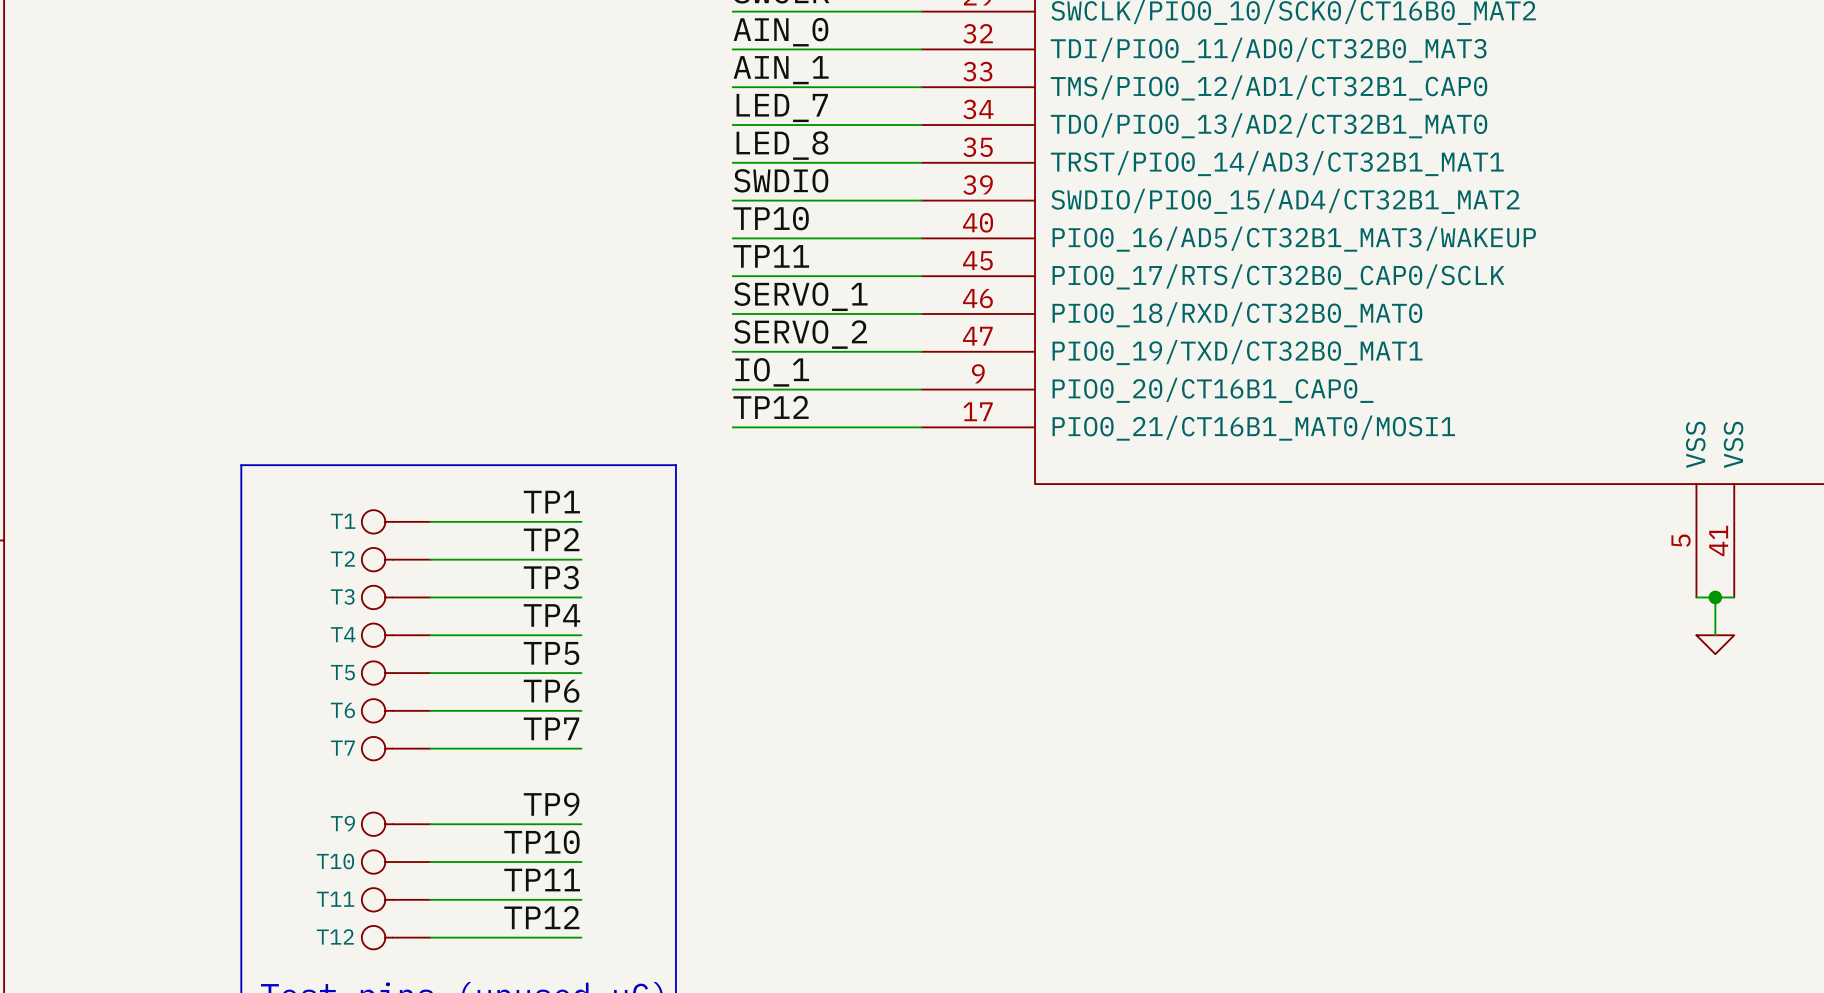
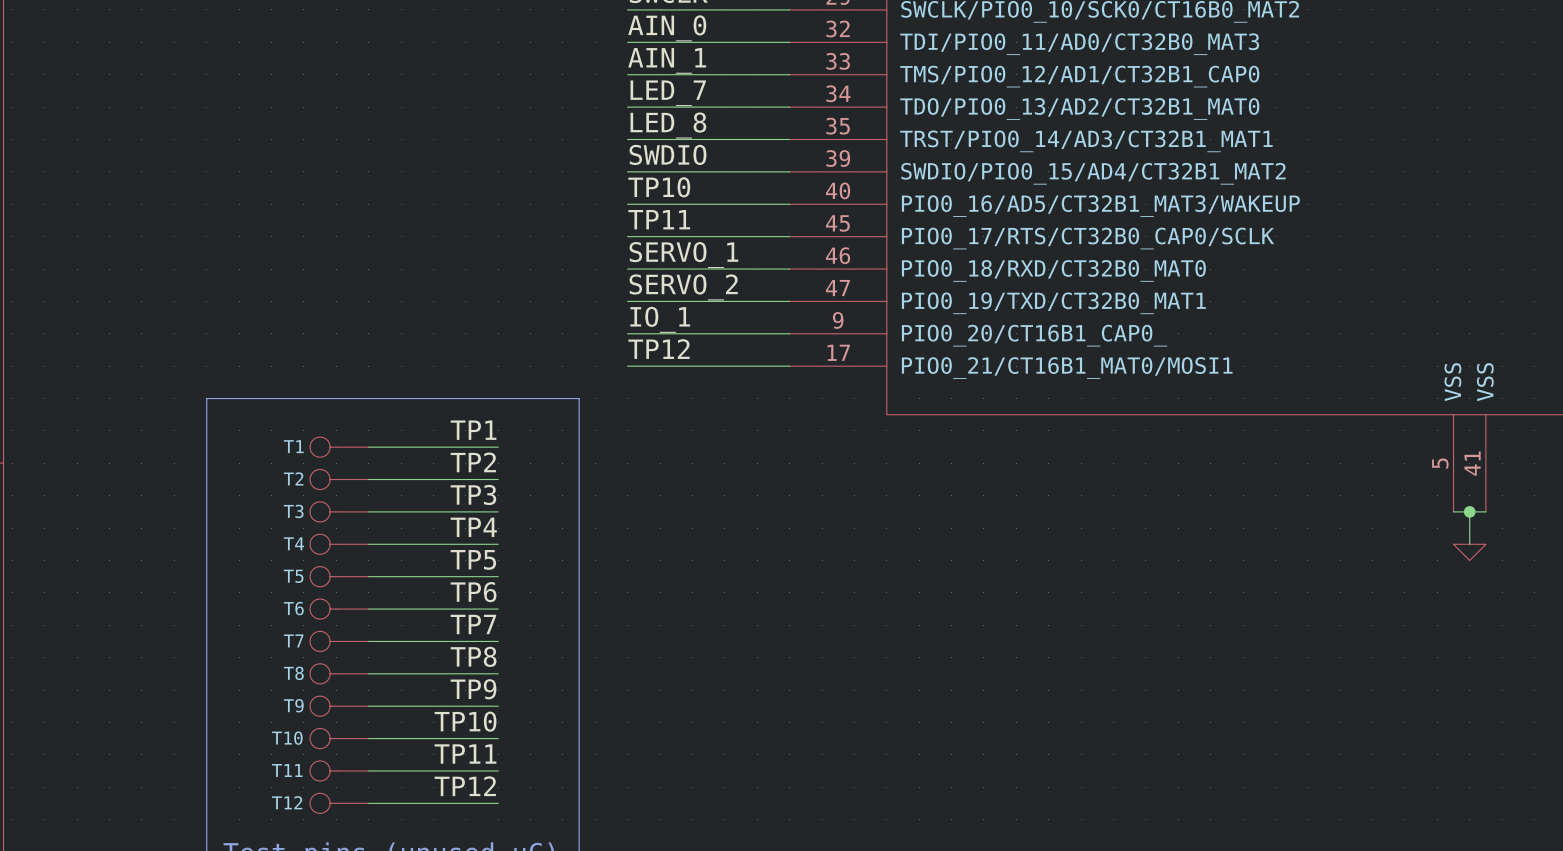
label: none -> TP8 (473, 656)
T8: none -> (339, 673)
wire: none -> (368, 673) (498, 673)

